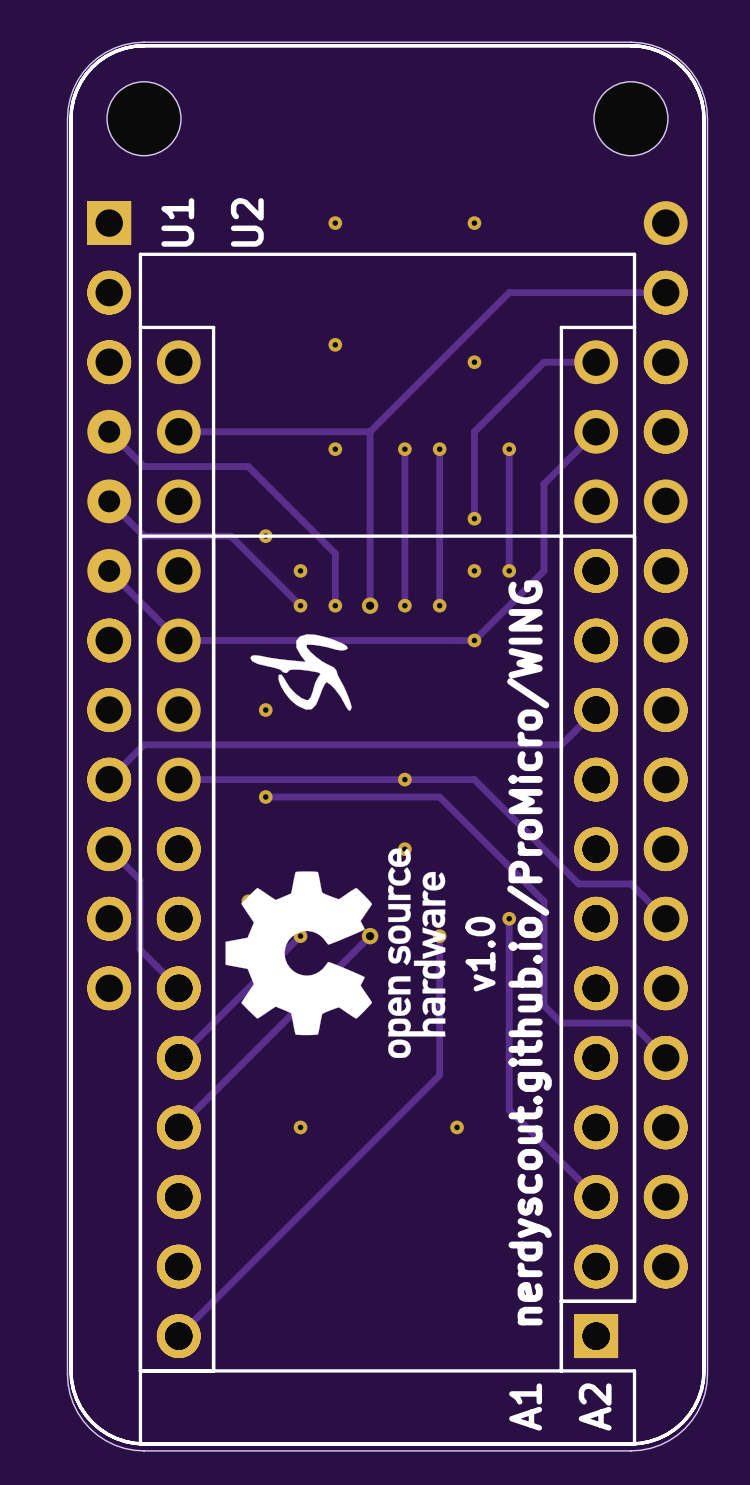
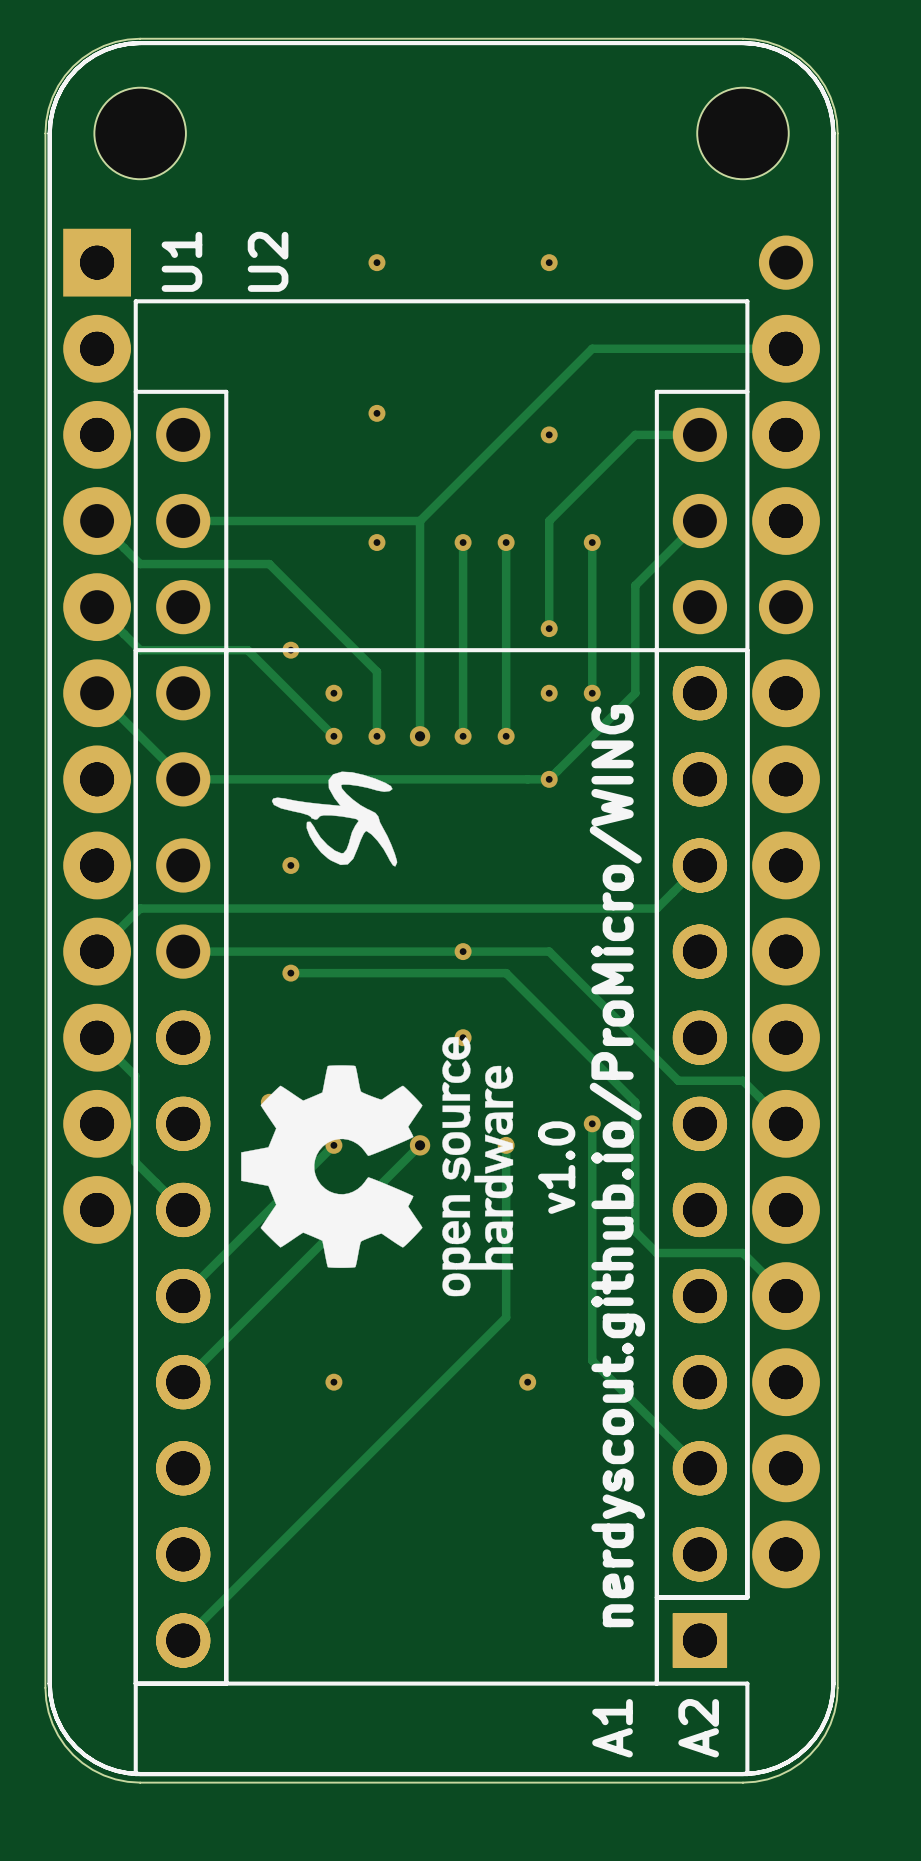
U1 footprint: [69, 44, 706, 1446] -> [47, 41, 836, 1777]

